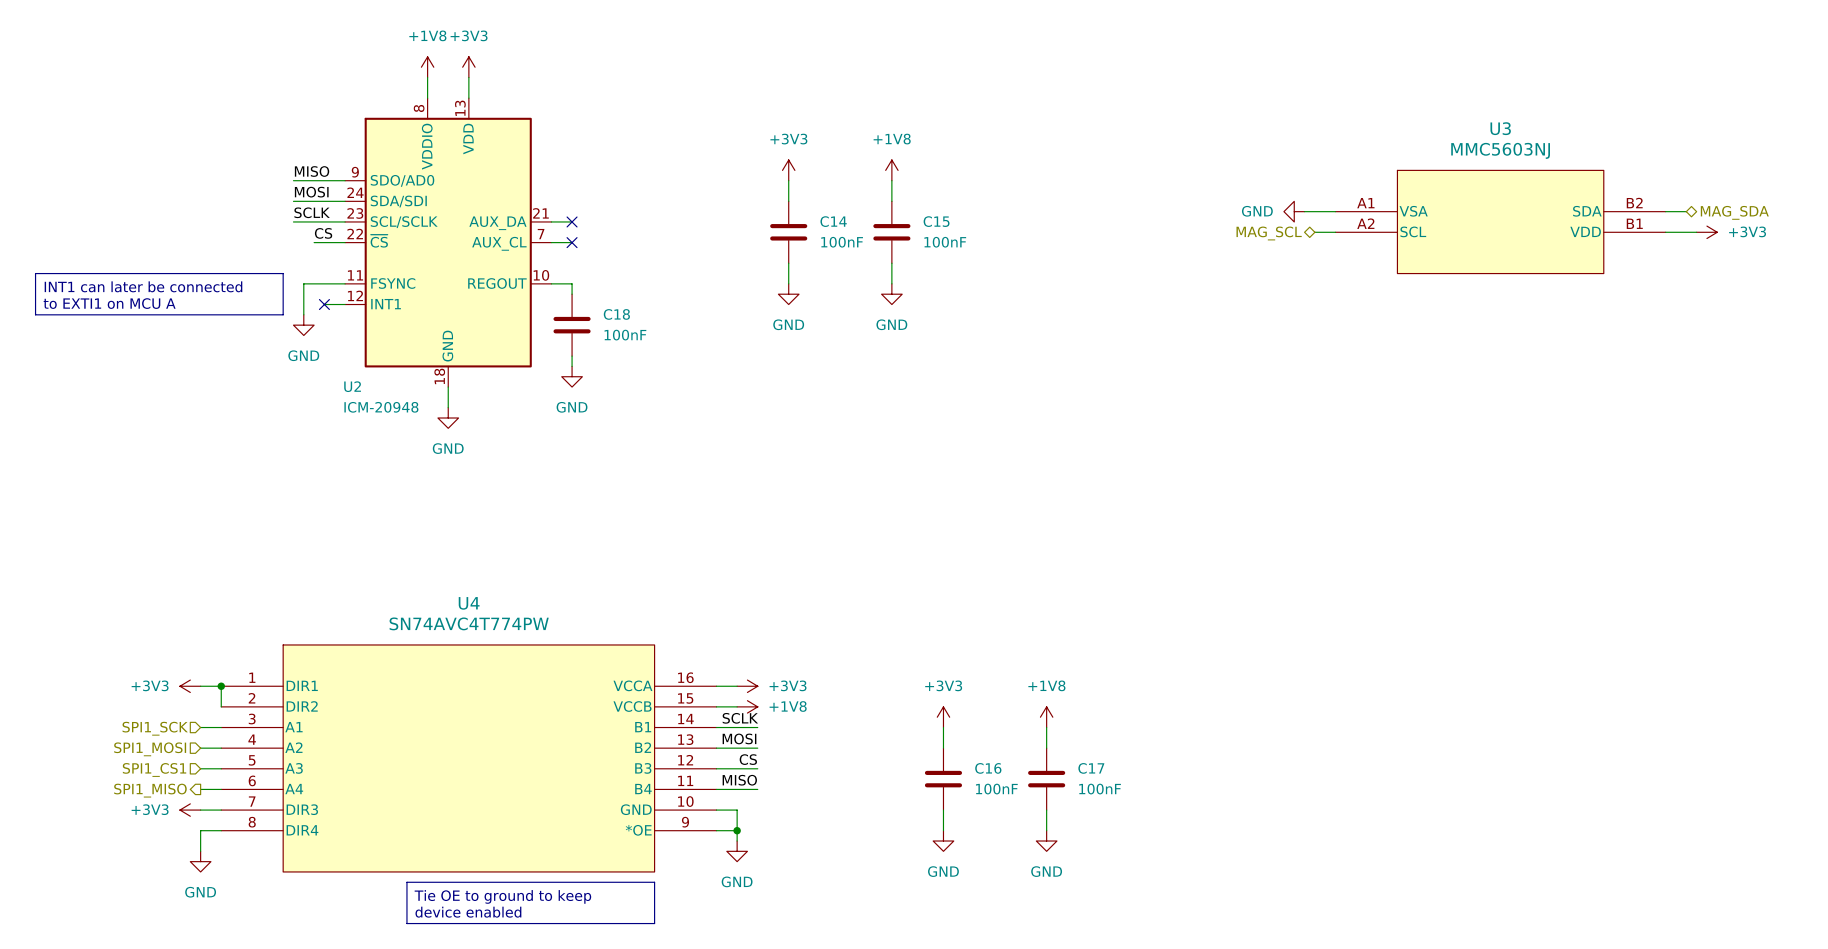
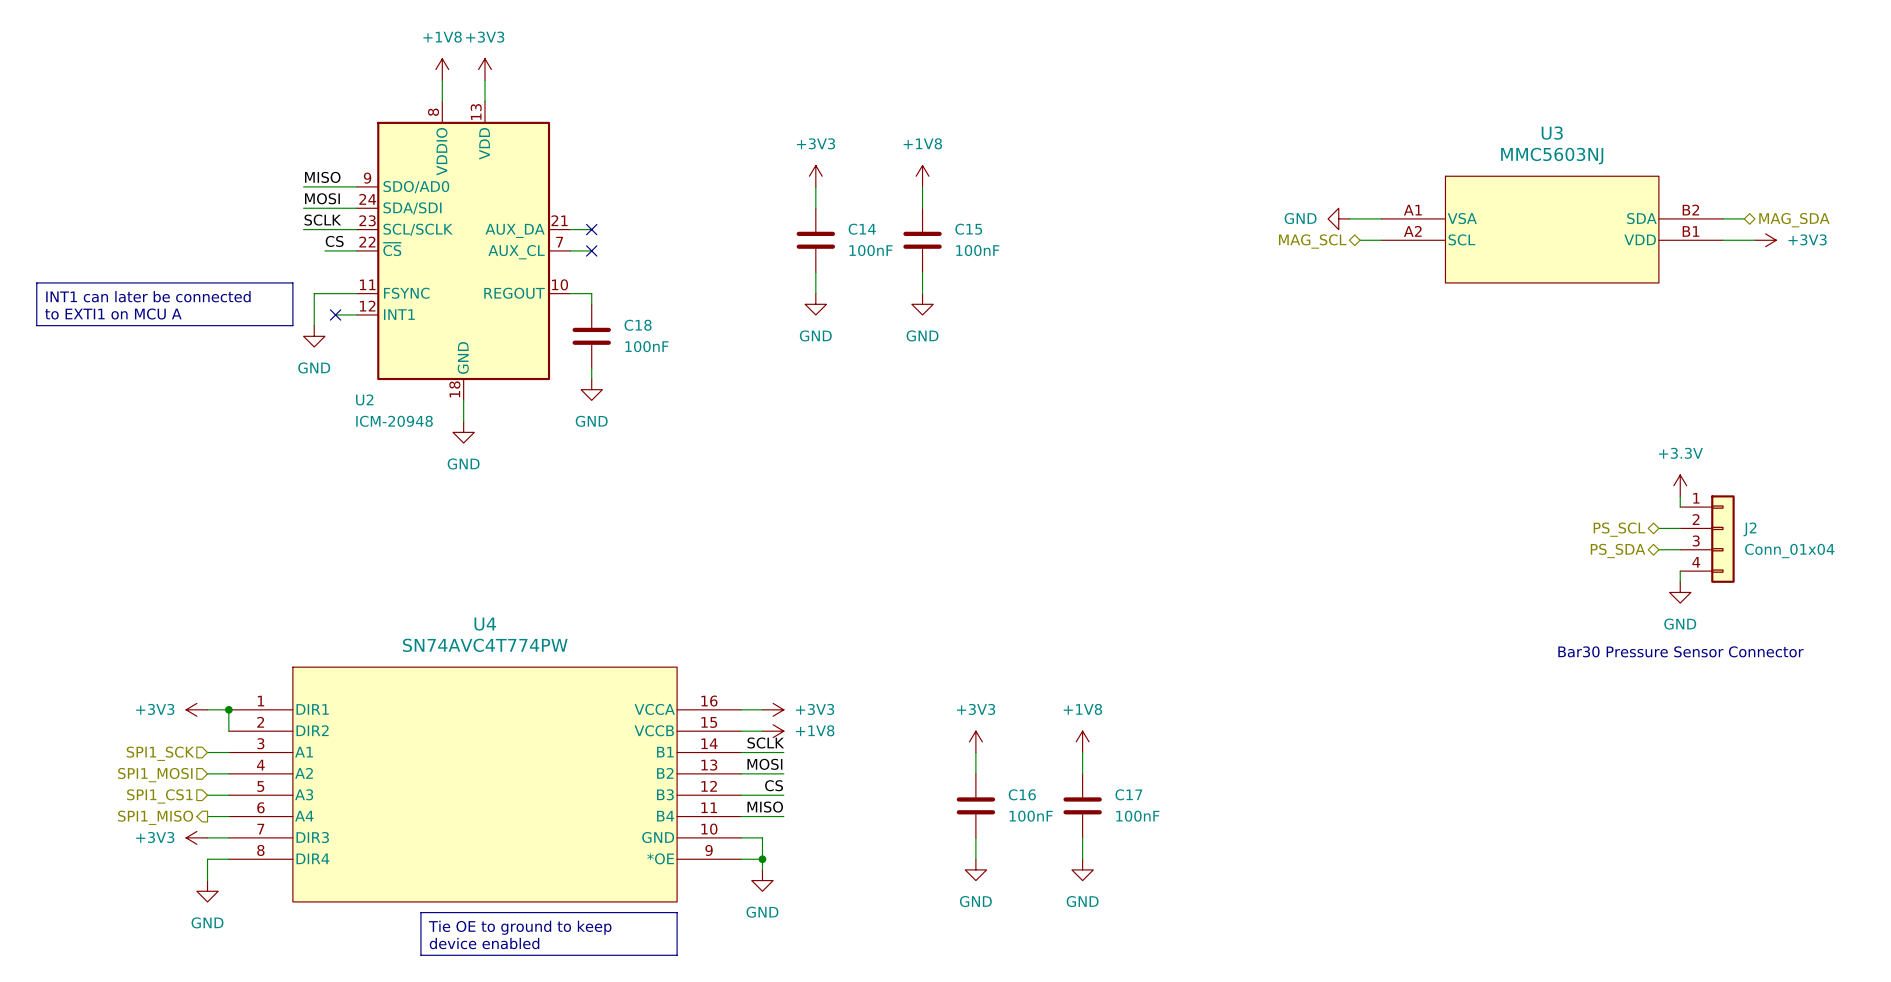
power symbol: none -> +3.3V (1680, 485)
wire: none -> (1680, 496) (1680, 507)
wire: none -> (1658, 528) (1680, 528)
hierarchical label: none -> PS_SCL (1619, 529)
J2: none -> Conn_01x04 (1707, 539)
wire: none -> (1658, 549) (1680, 549)
hierarchical label: none -> PS_SDA (1618, 550)
wire: none -> (1680, 571) (1680, 581)
power symbol: none -> GND (1680, 592)
text: none -> Bar30 Pressure Sensor Connector (1680, 651)

